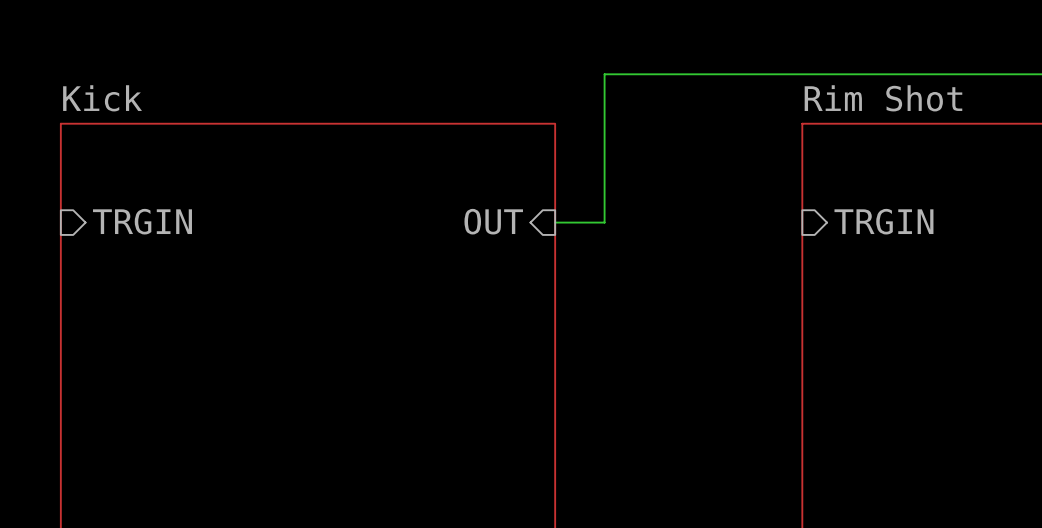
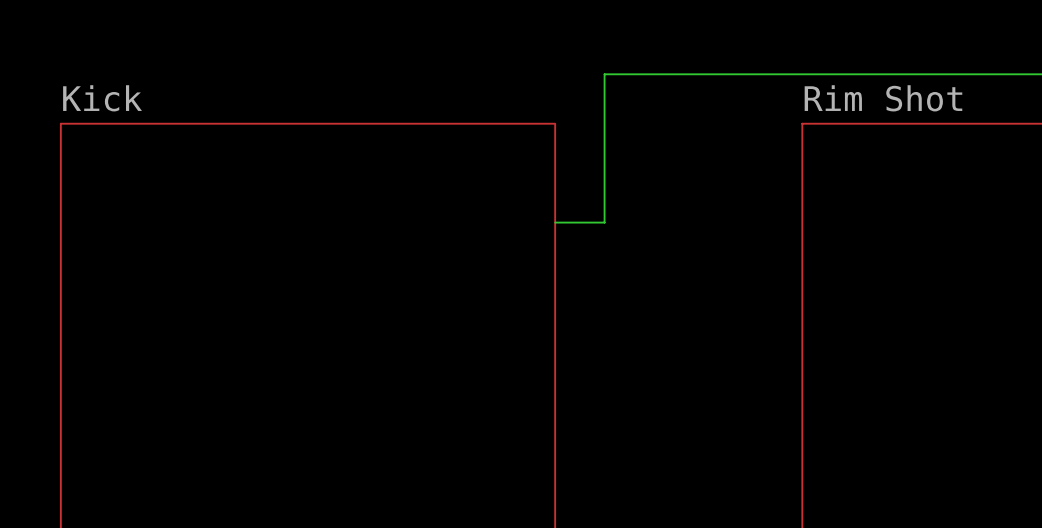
sheet pin: TRGIN (142, 221) -> none
sheet pin: OUT (493, 221) -> none
sheet pin: TRGIN (883, 221) -> none

